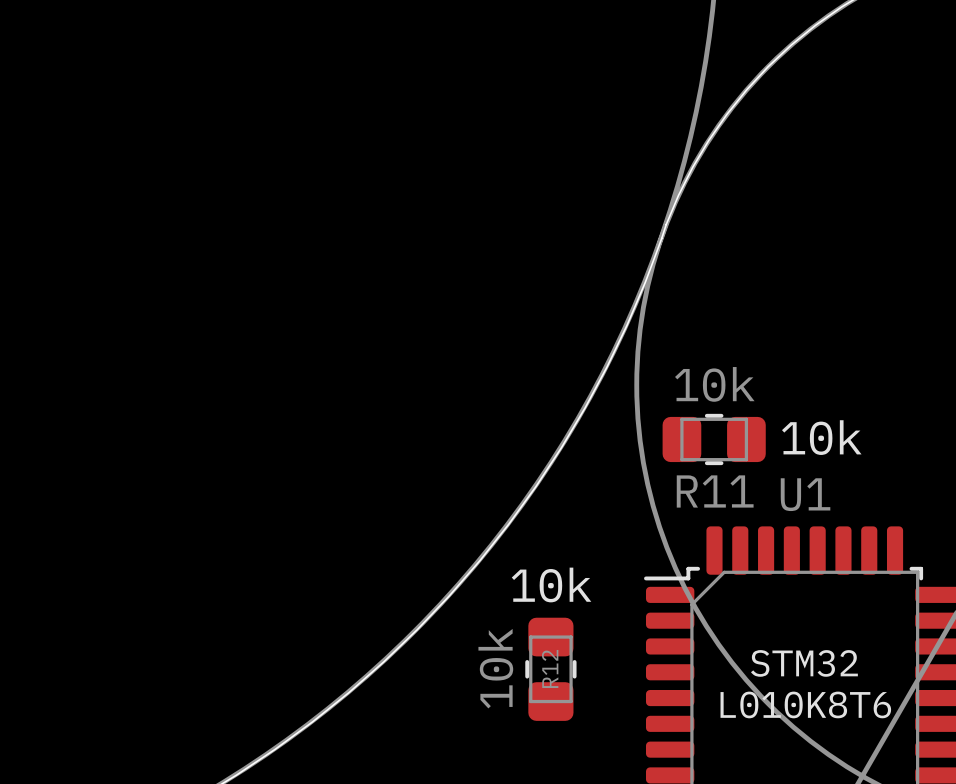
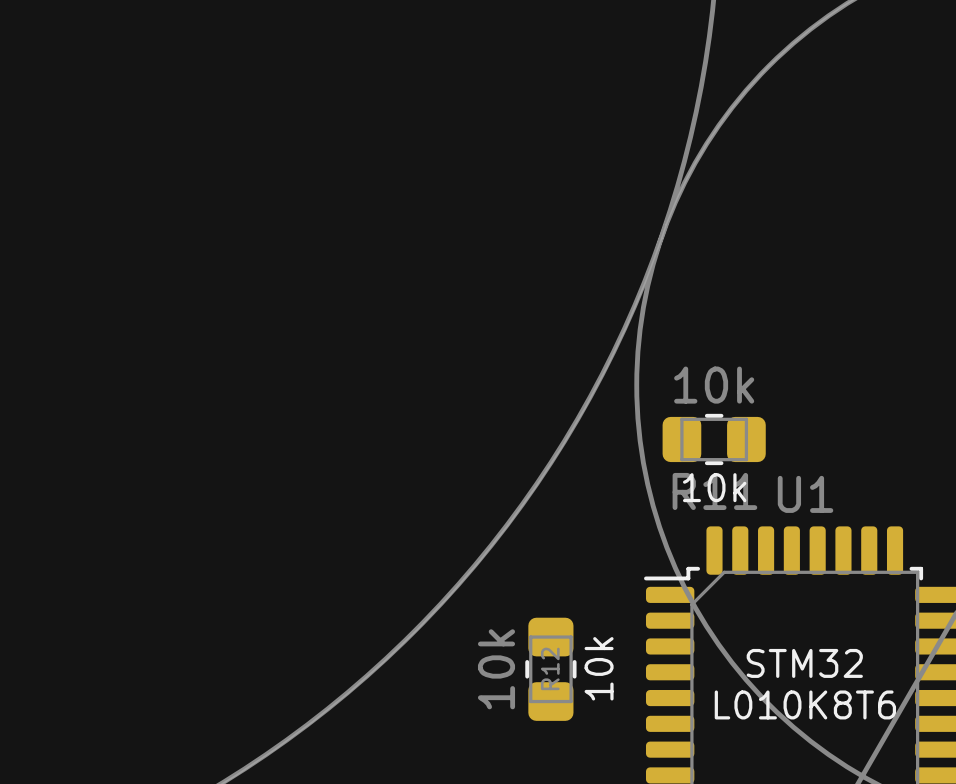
text: 10k (821, 437) -> none
text: none -> 10k (714, 487)
text: 10k (551, 584) -> none
text: none -> 10k (599, 668)

